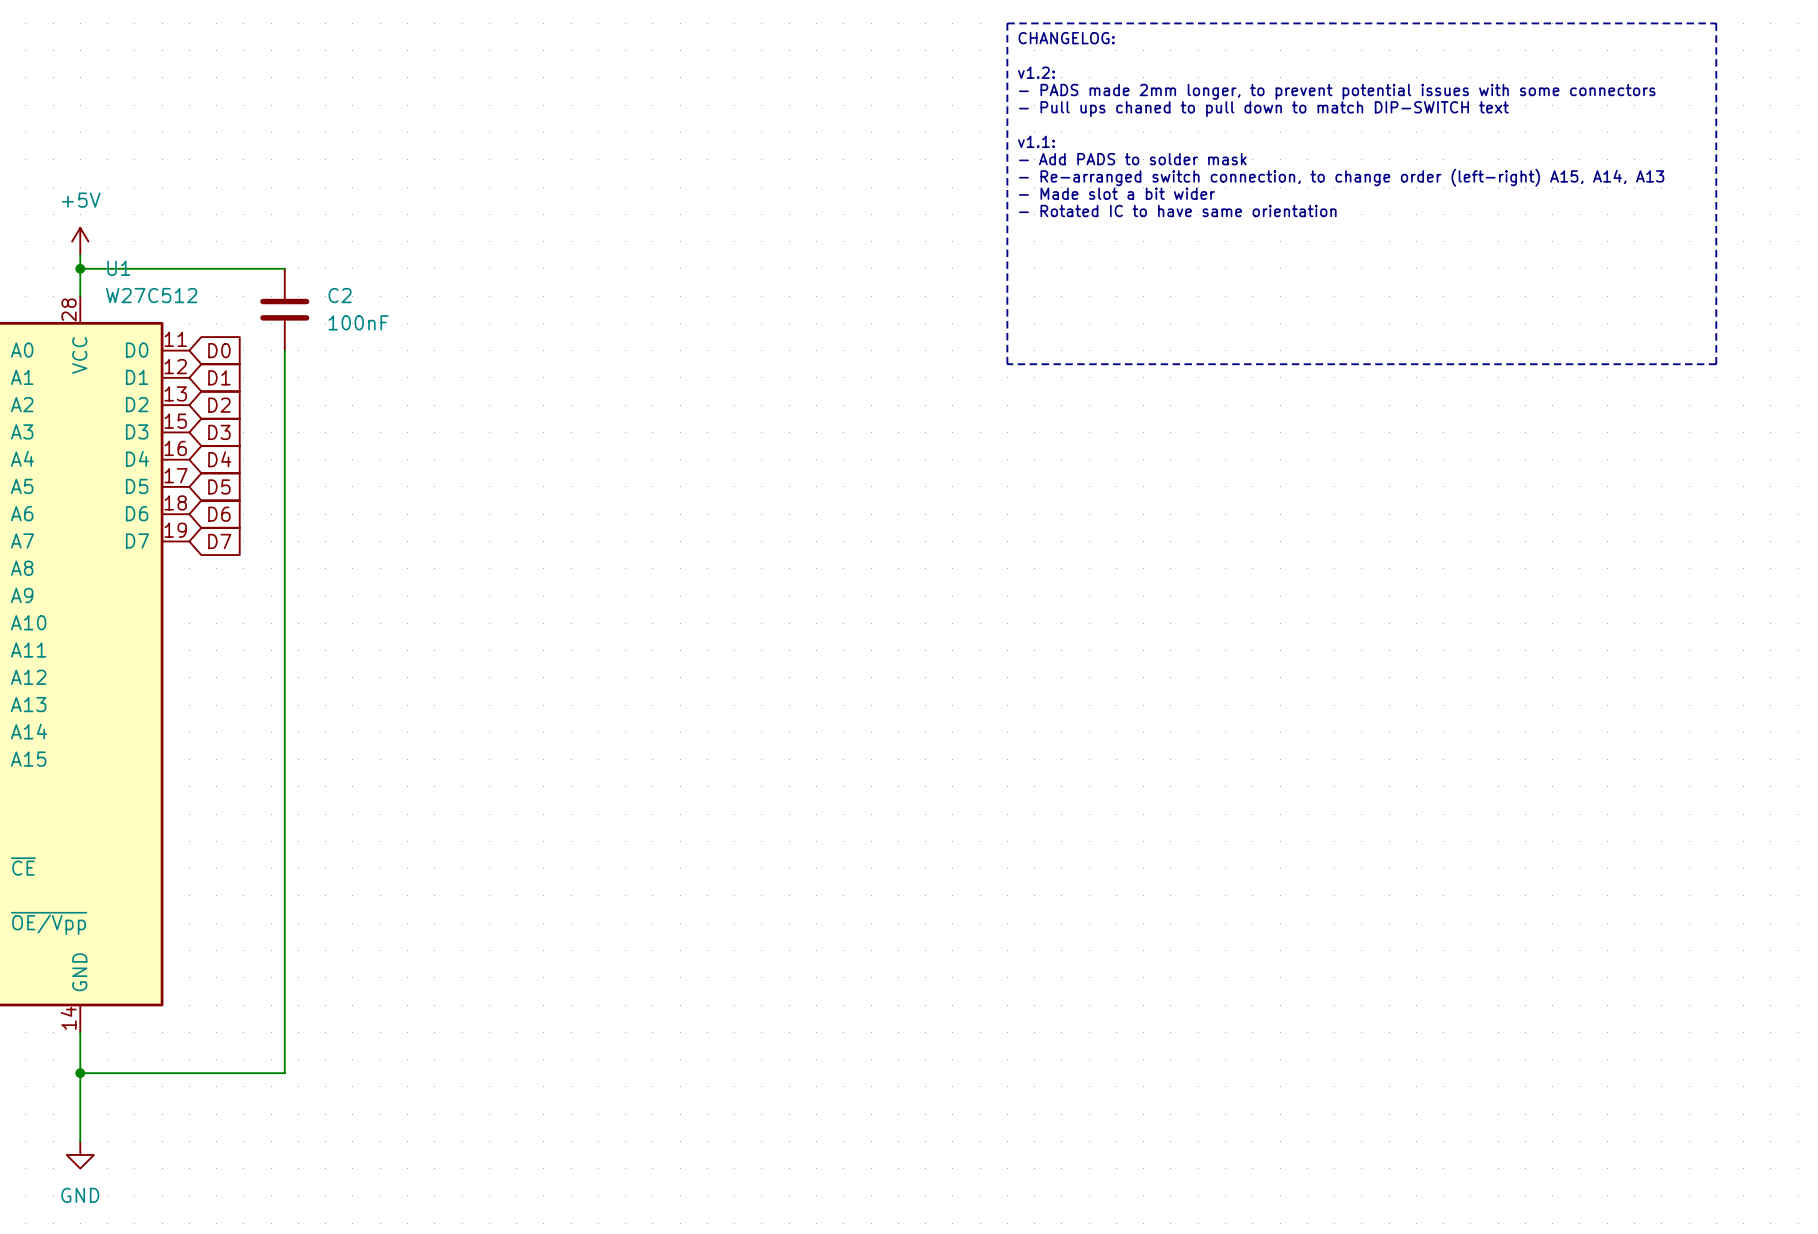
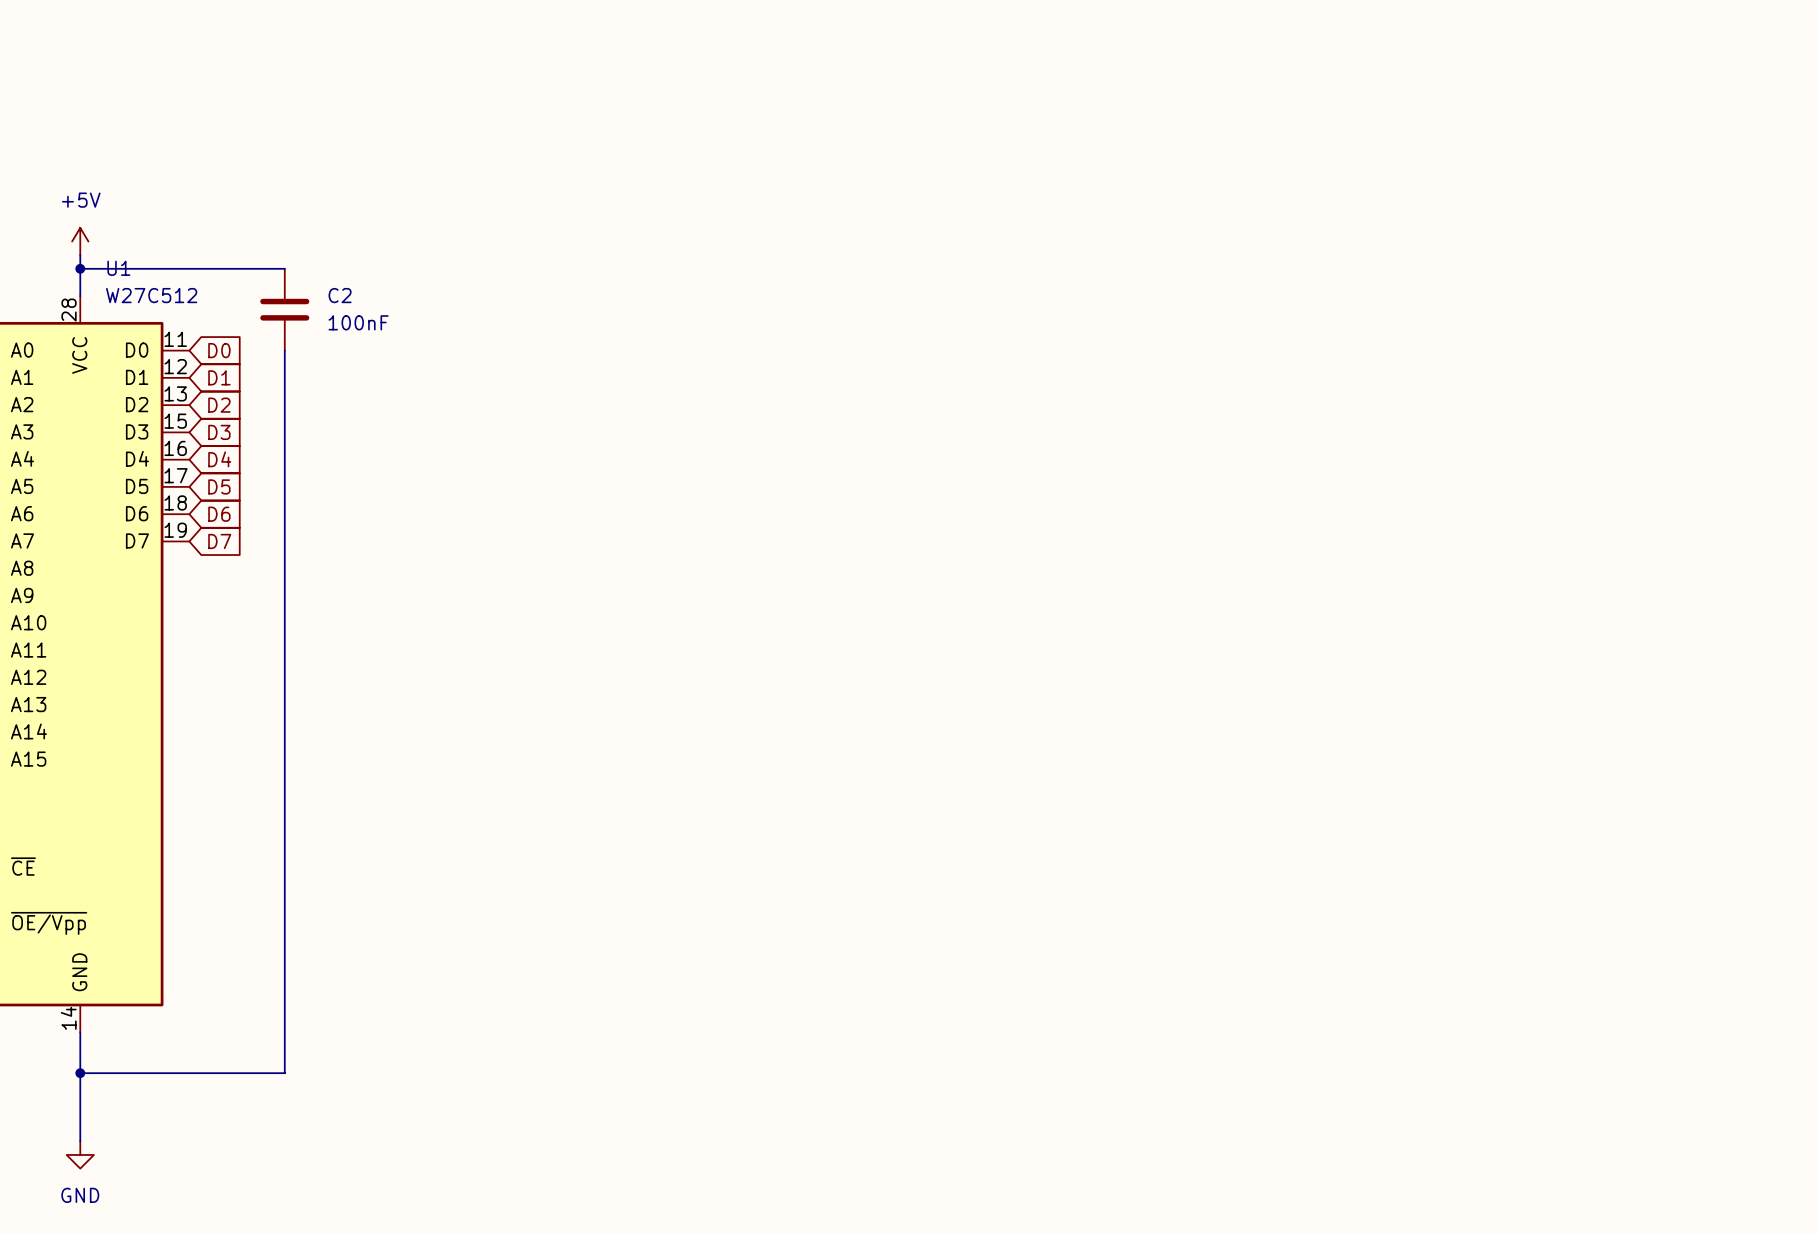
line: (1007, 23) (1716, 23) (1716, 364) (1007, 364) (1007, 23) -> none
text: CHANGELOG: (1066, 38) -> none
text: v1.2: (1036, 72) -> none
text: - PADS made 2mm longer, to prevent potential issues with some connectors (1337, 91) -> none
text: - Pull ups chaned to pull down to match DIP-SWITCH text (1263, 109) -> none
text: v1.1: (1036, 141) -> none
text: - Add PADS to solder mask (1132, 159) -> none
text: - Re-arranged switch connection, to change order (left-right) A15, A14, A13 (1341, 177) -> none
text: - Made slot a bit wider (1116, 193) -> none
text: - Rotated IC to have same orientation (1177, 210) -> none

